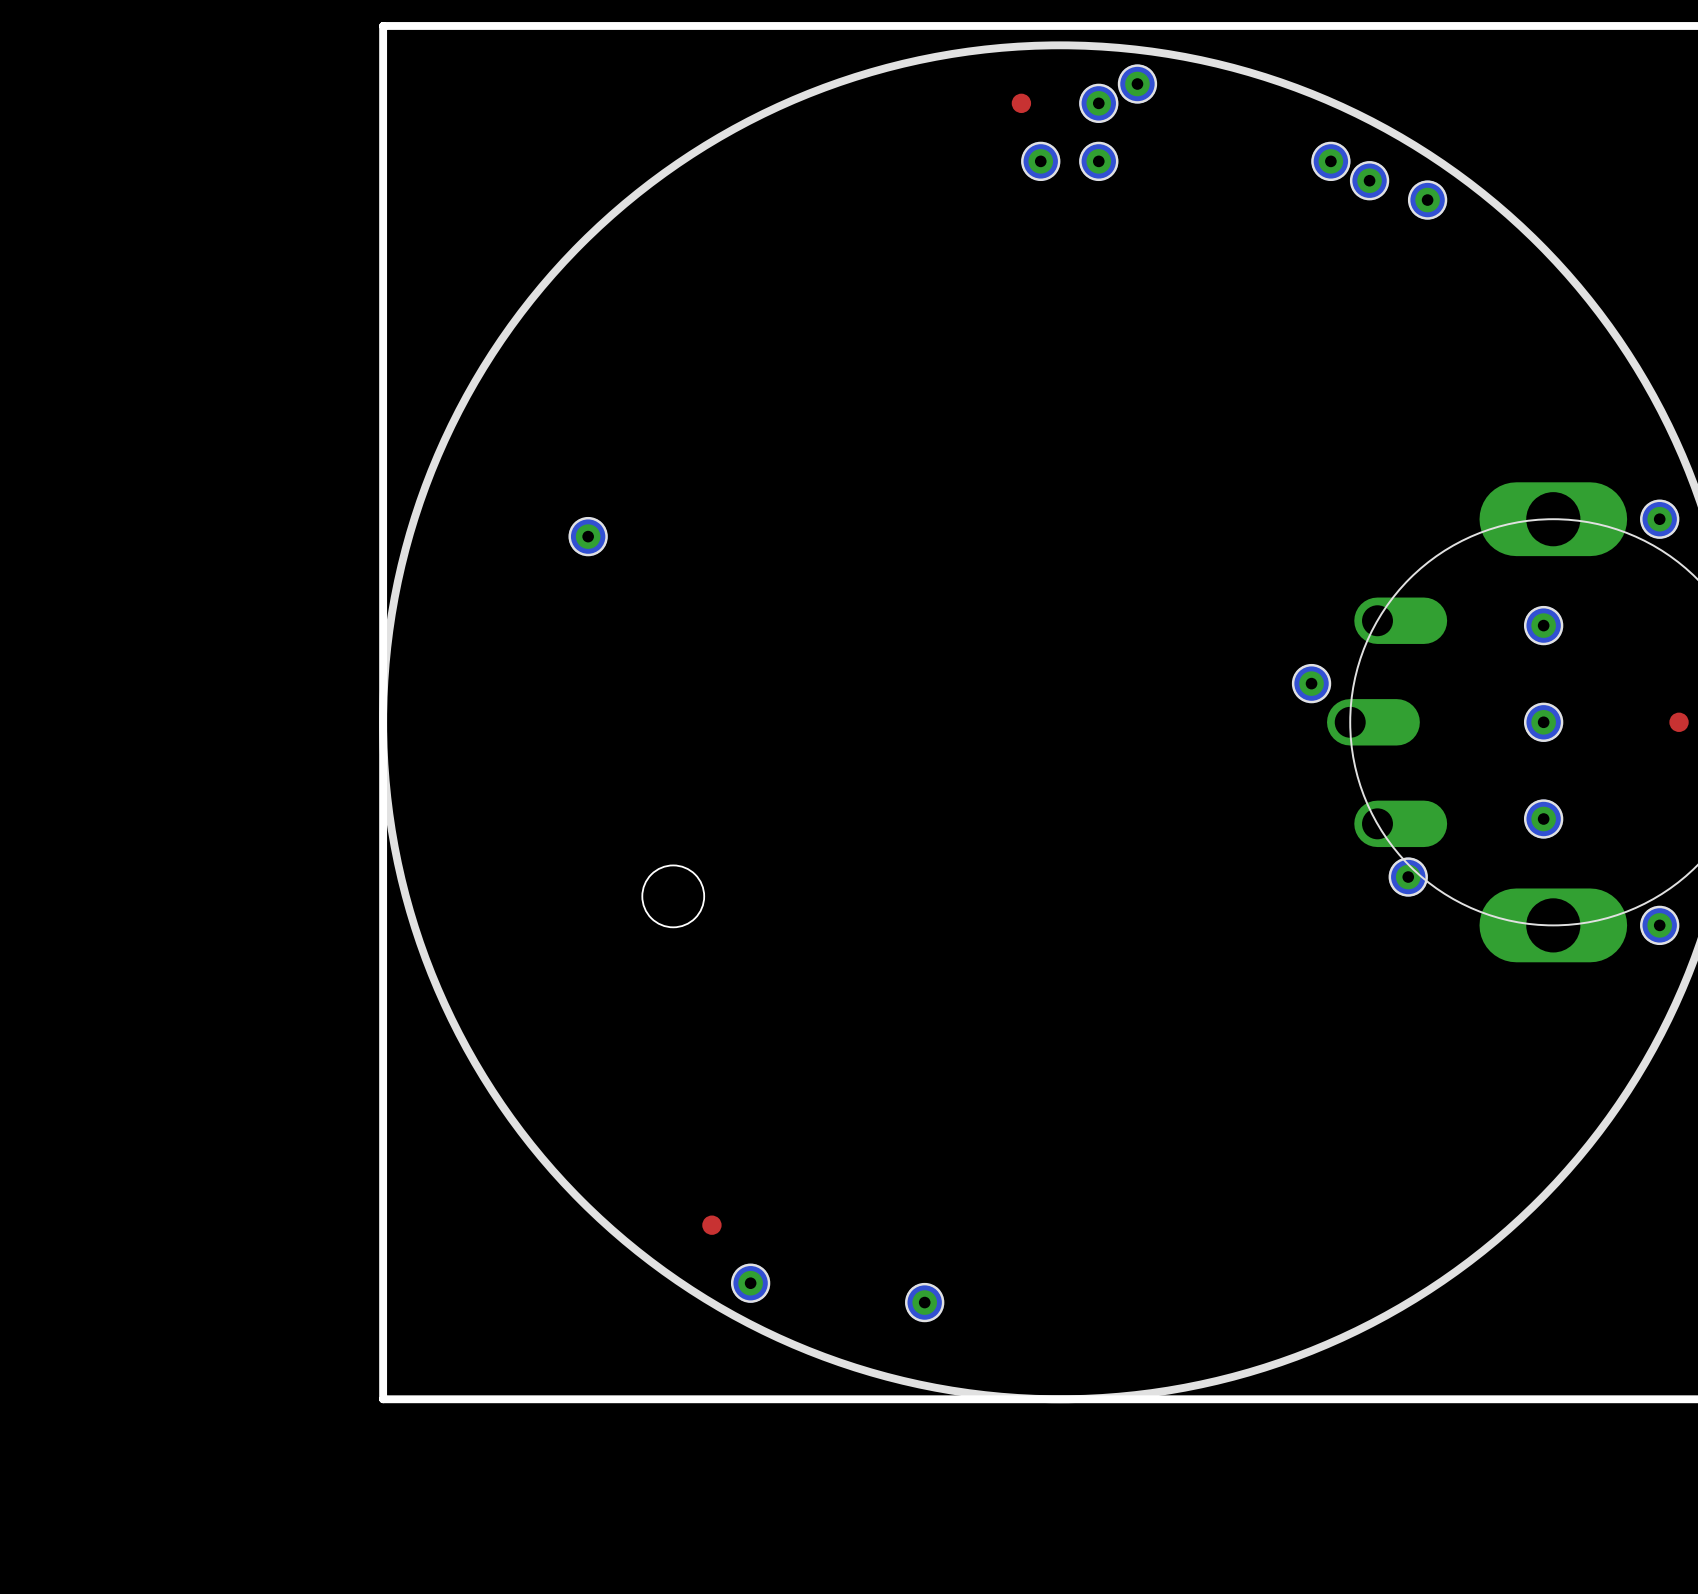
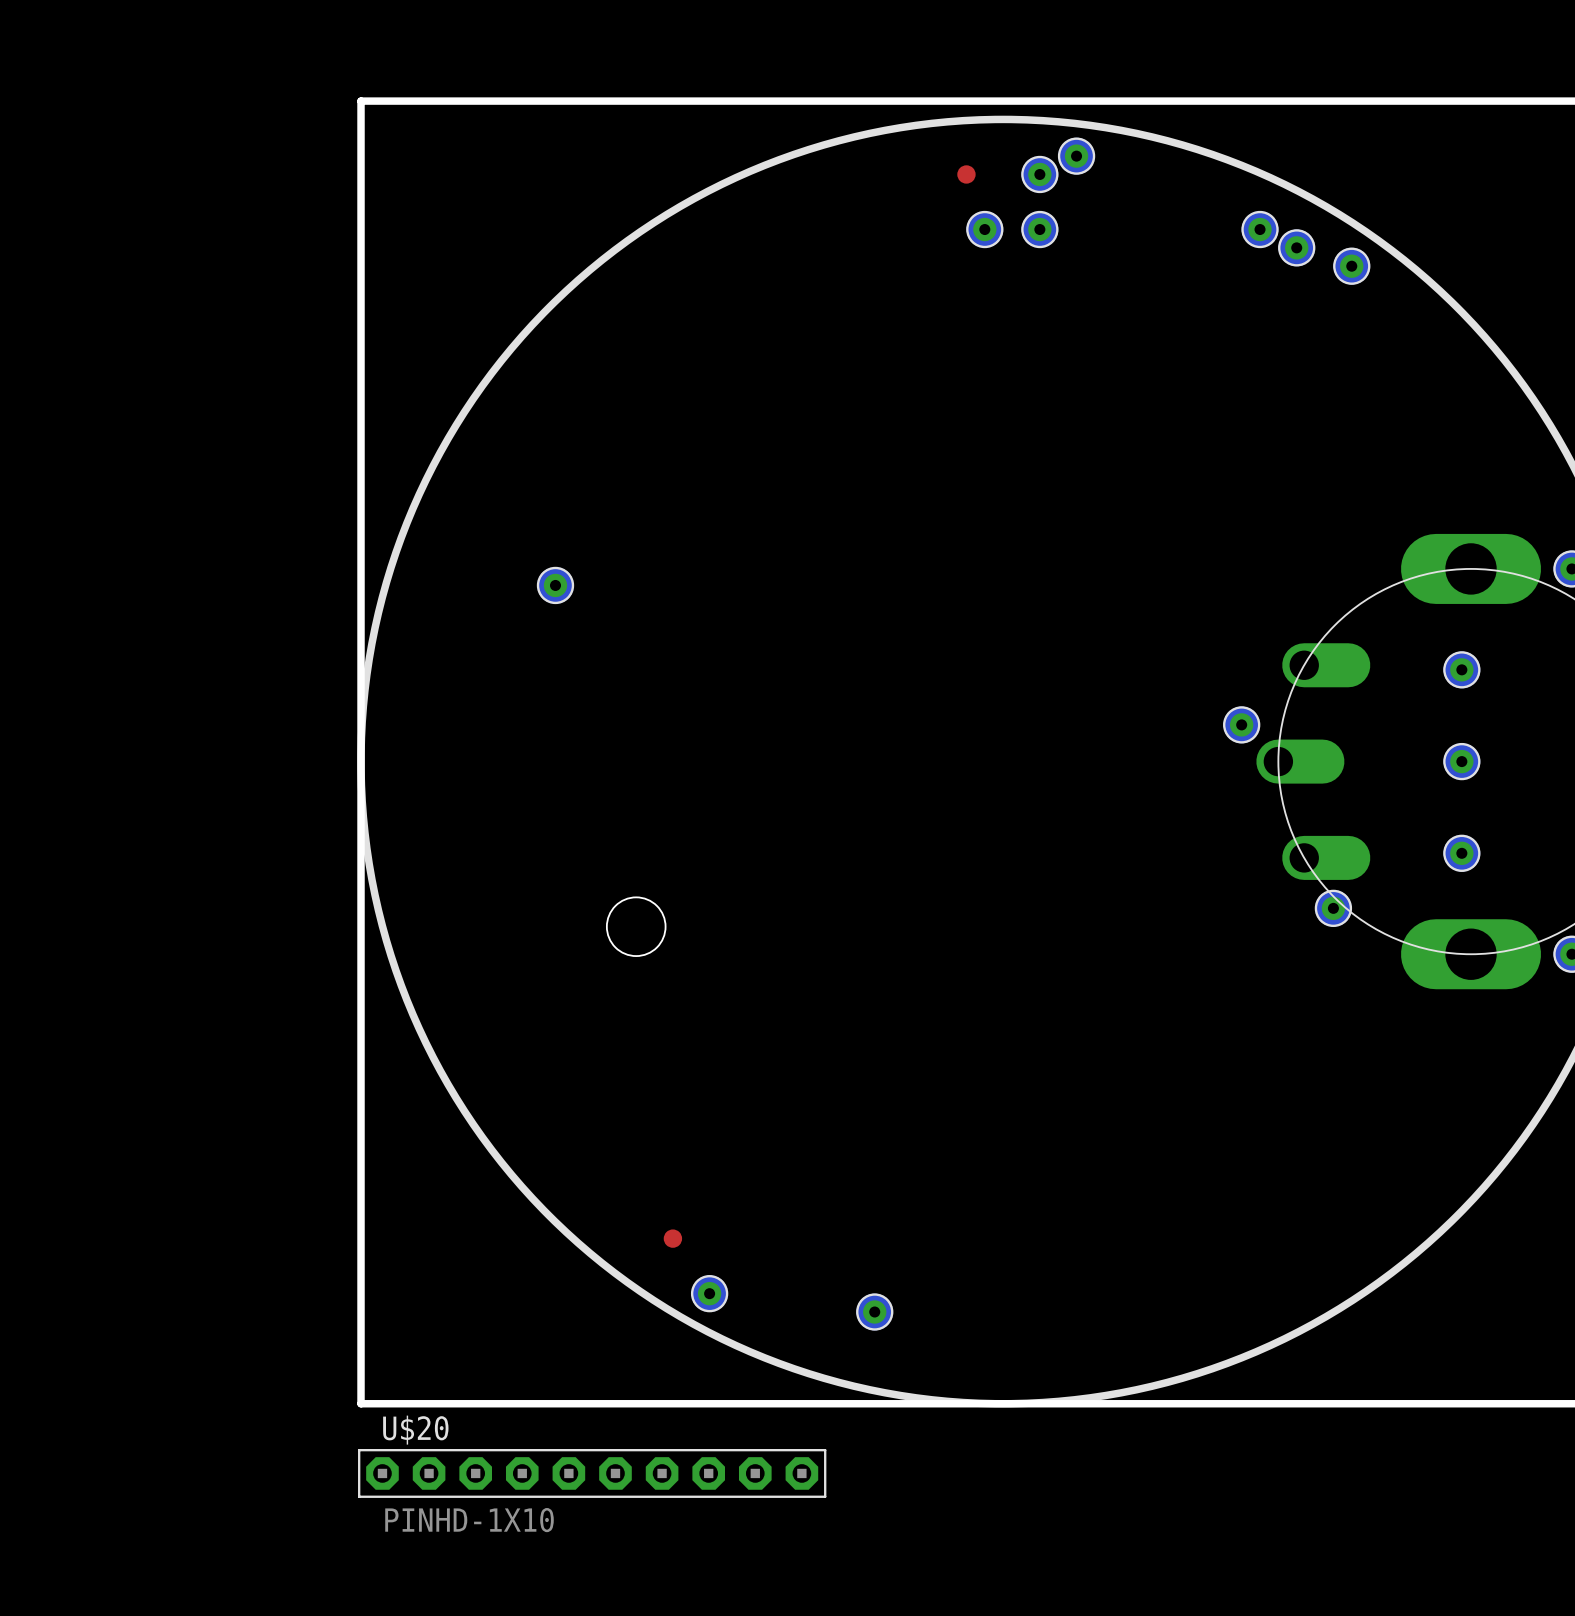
U$20: none -> PINHD-1X10 (592, 1473)

